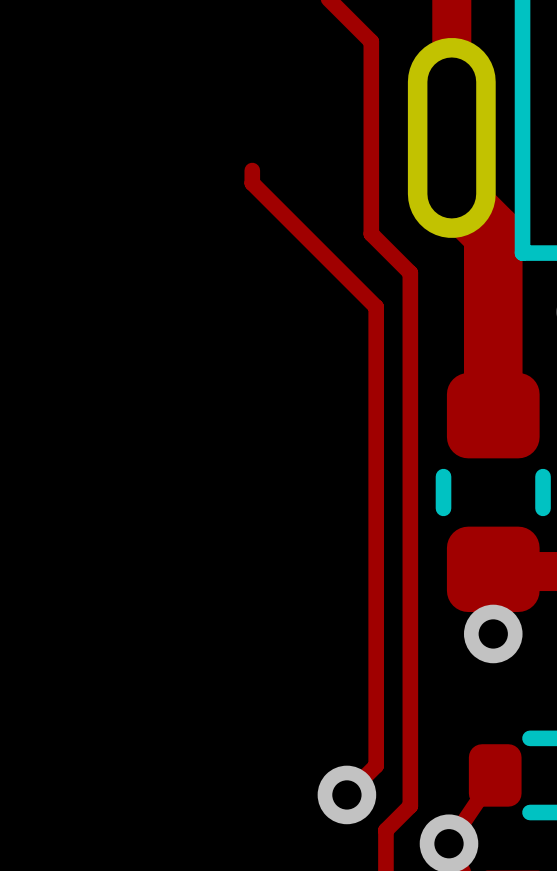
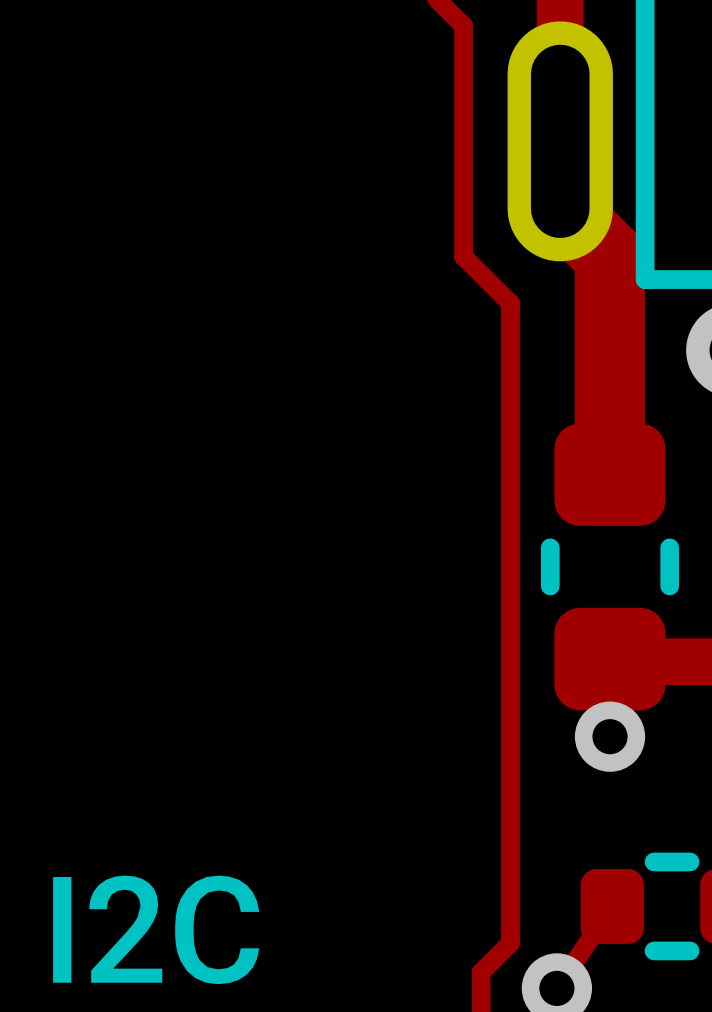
track: (252, 170) (252, 183) (376, 307) (376, 765) (346, 794) -> none
drawing: none -> [53, 875, 260, 985]
via: (346, 794) -> none

